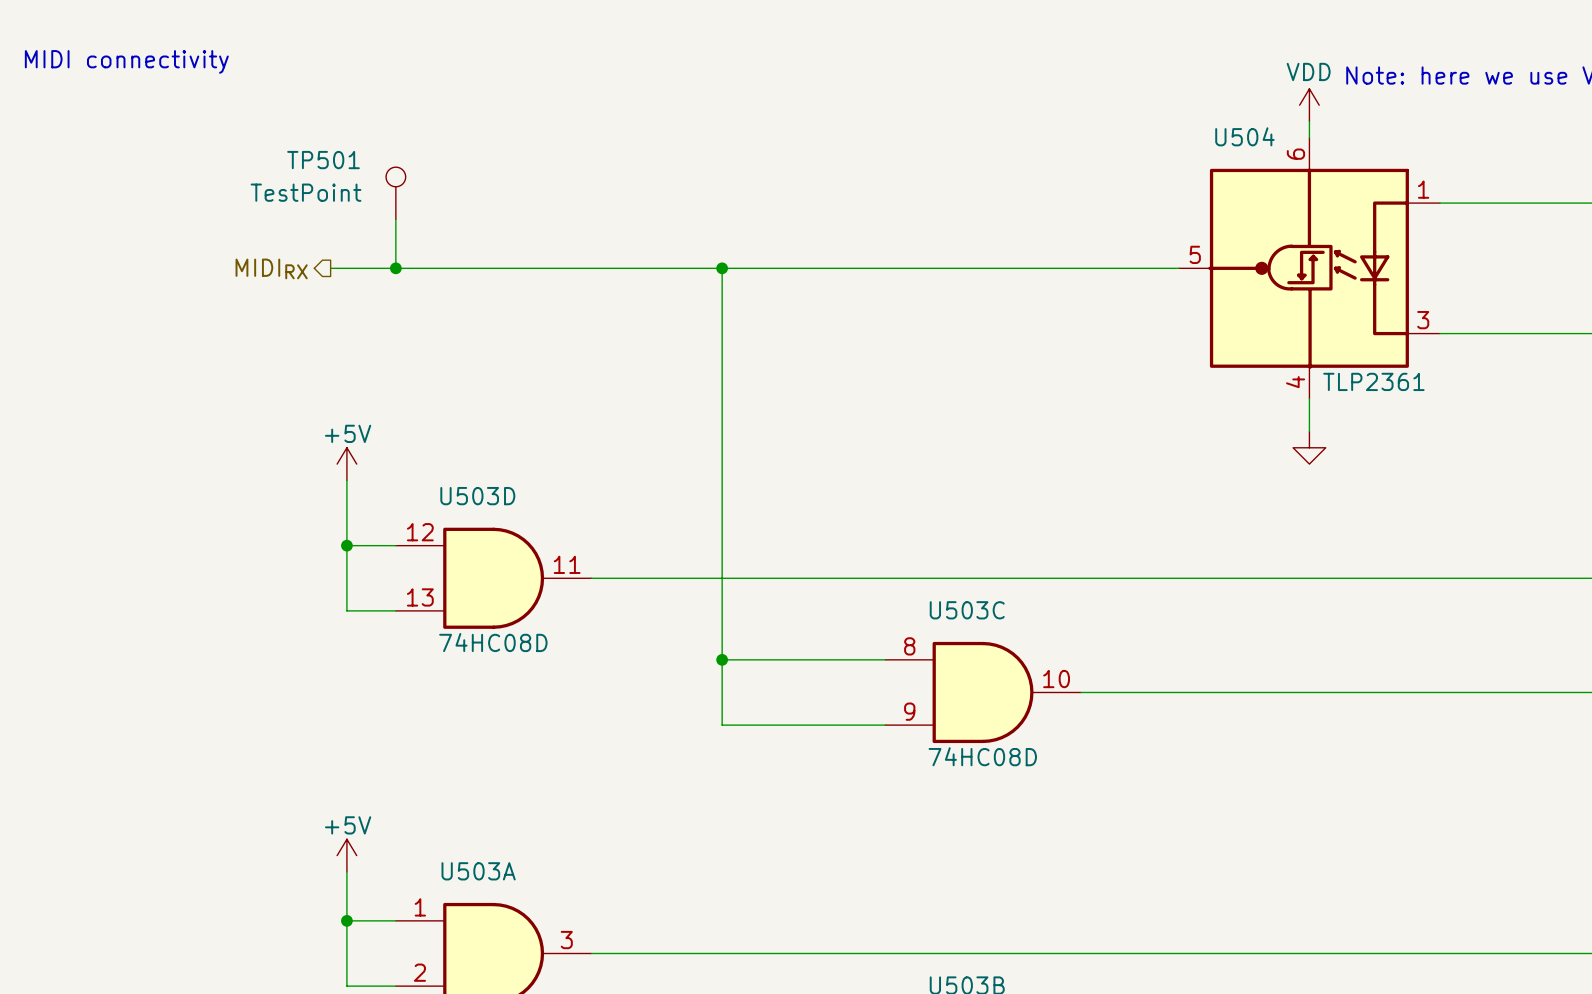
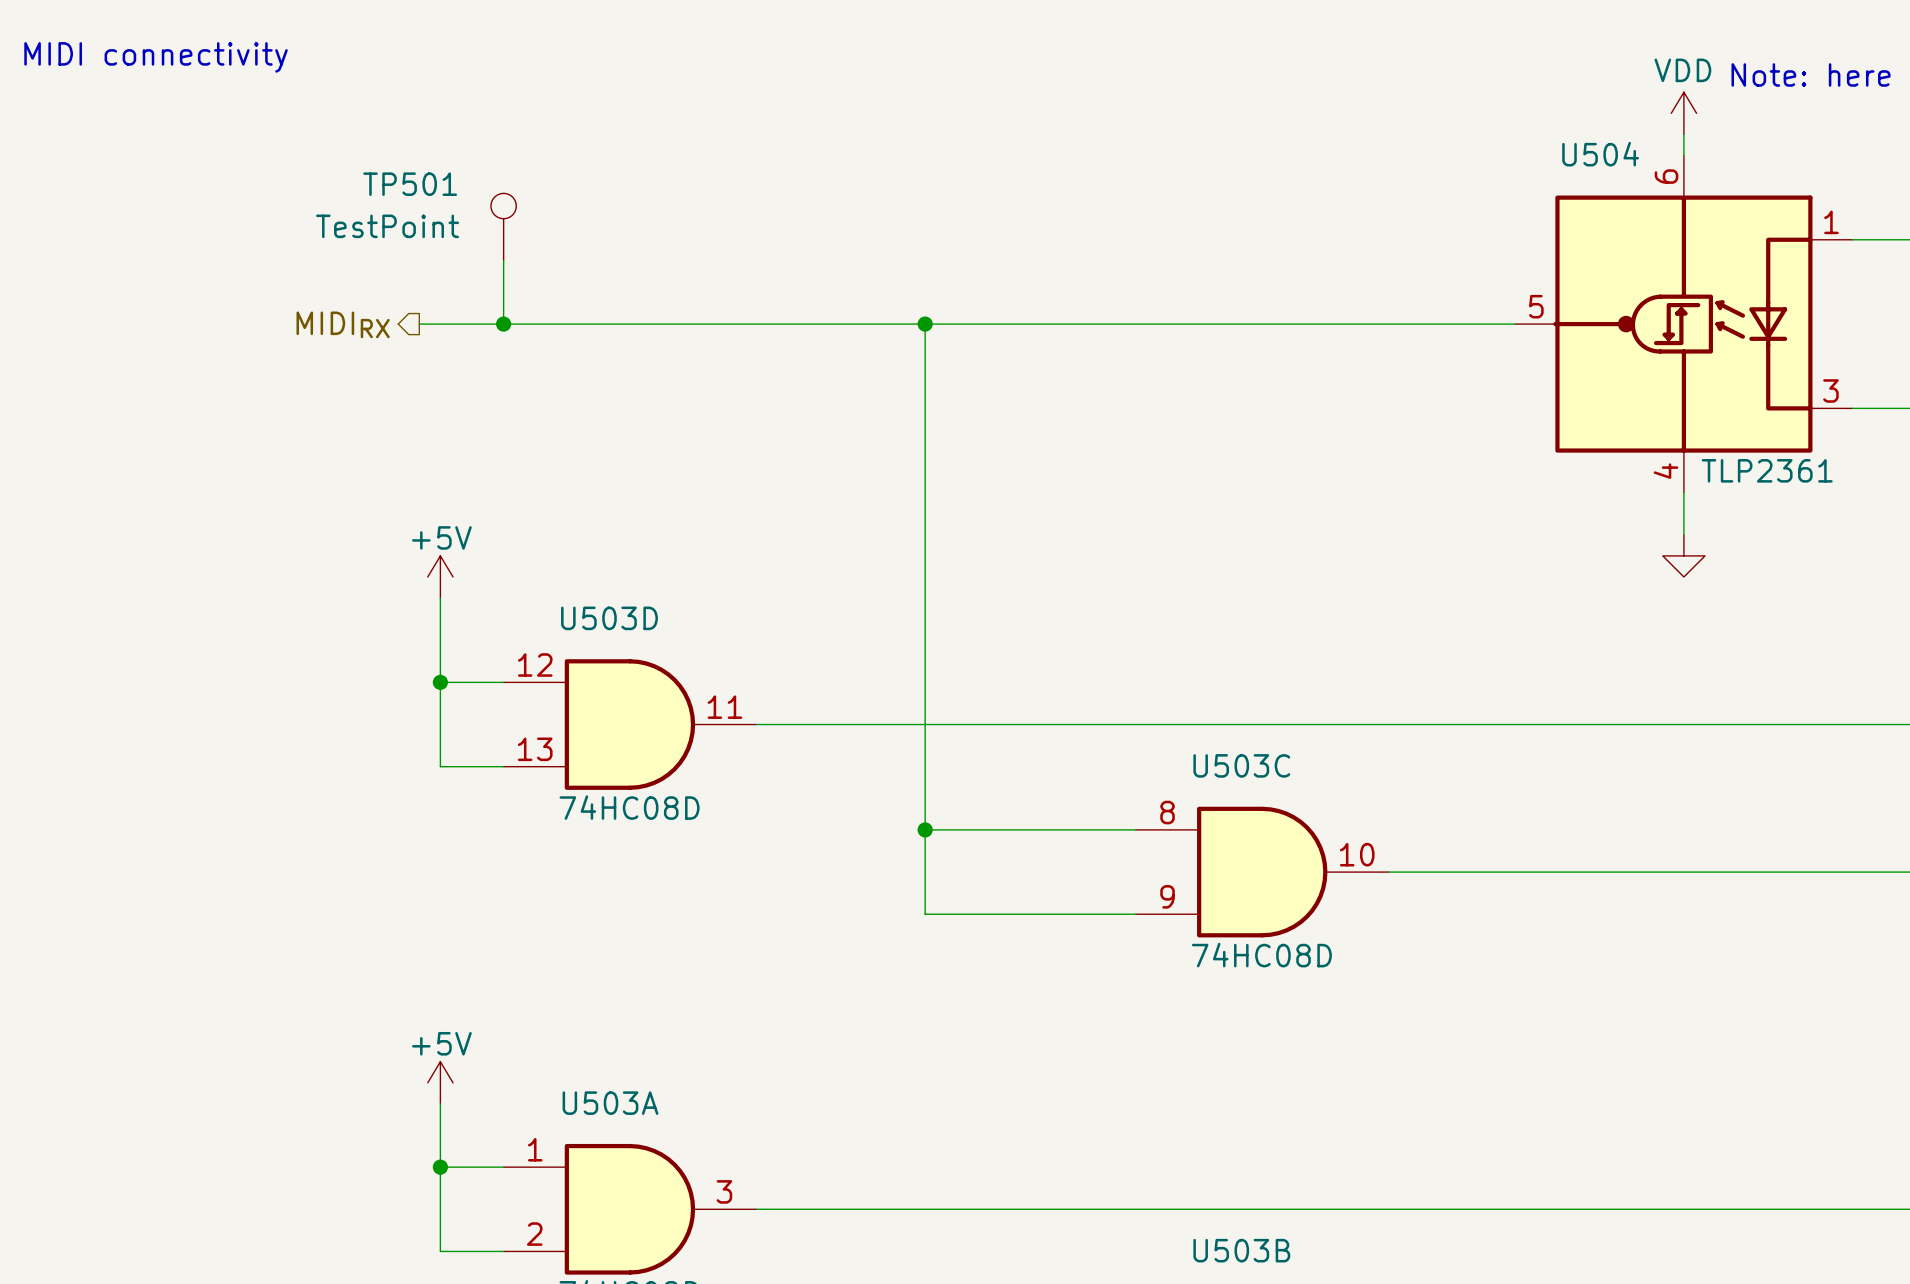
U504 symbol: [1178, 137, 1440, 399] -> [1515, 155, 1853, 493]

